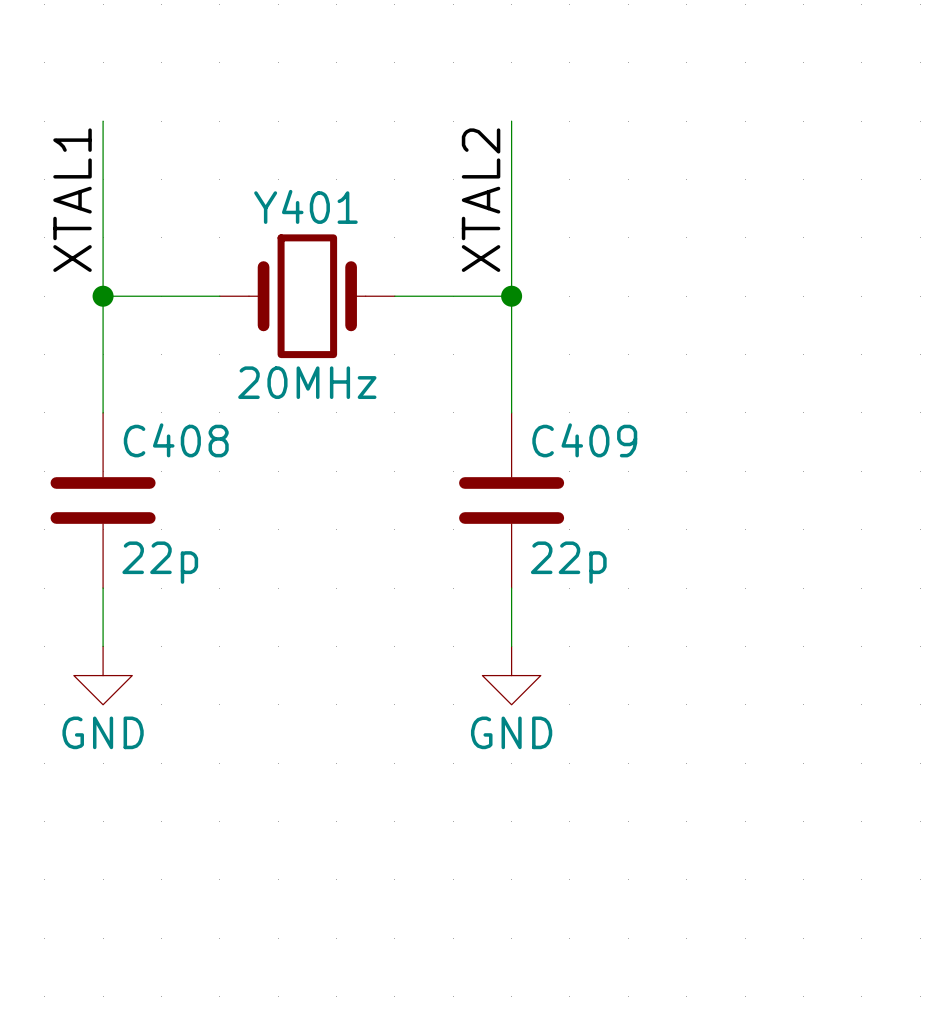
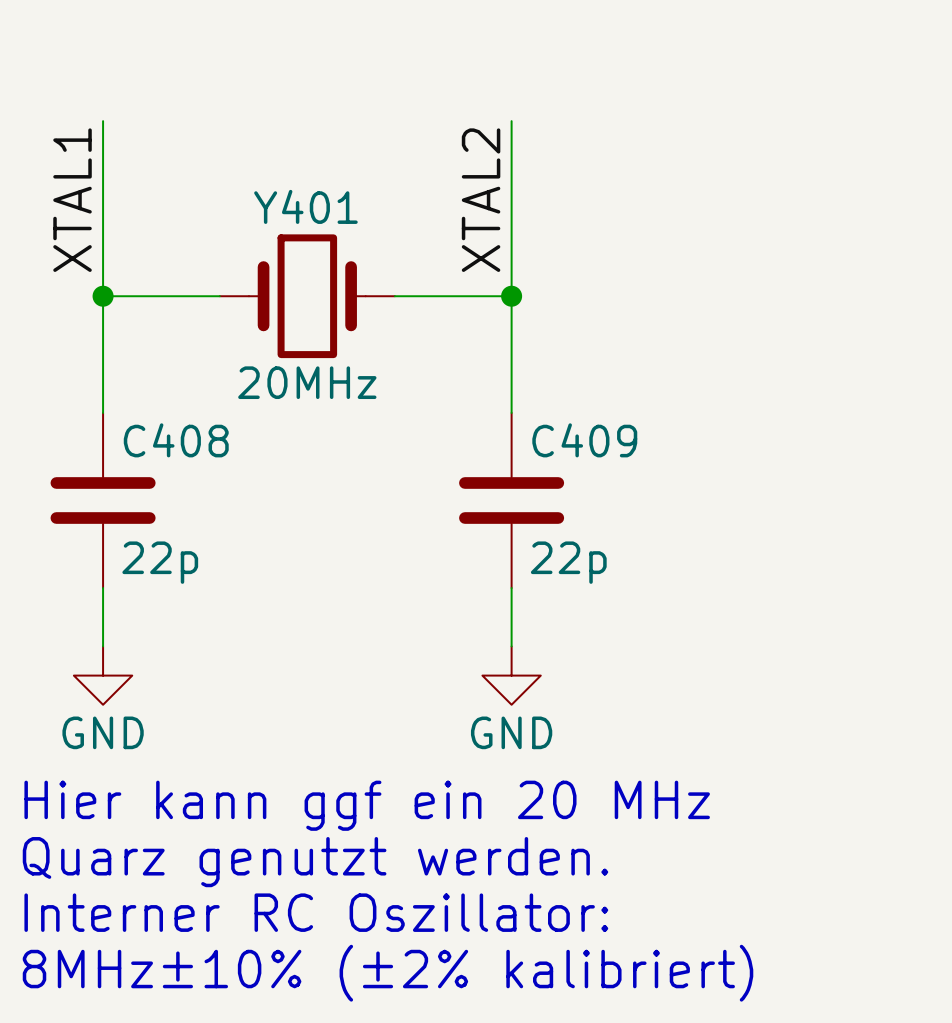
text: none -> Hier kann ggf ein 20 MHz (367, 805)
text: none -> Quarz genutzt werden. (315, 862)
text: none -> Interner RC Oszillator: (316, 912)
text: none -> 8MHz±10% (±2% kalibriert) (388, 973)

